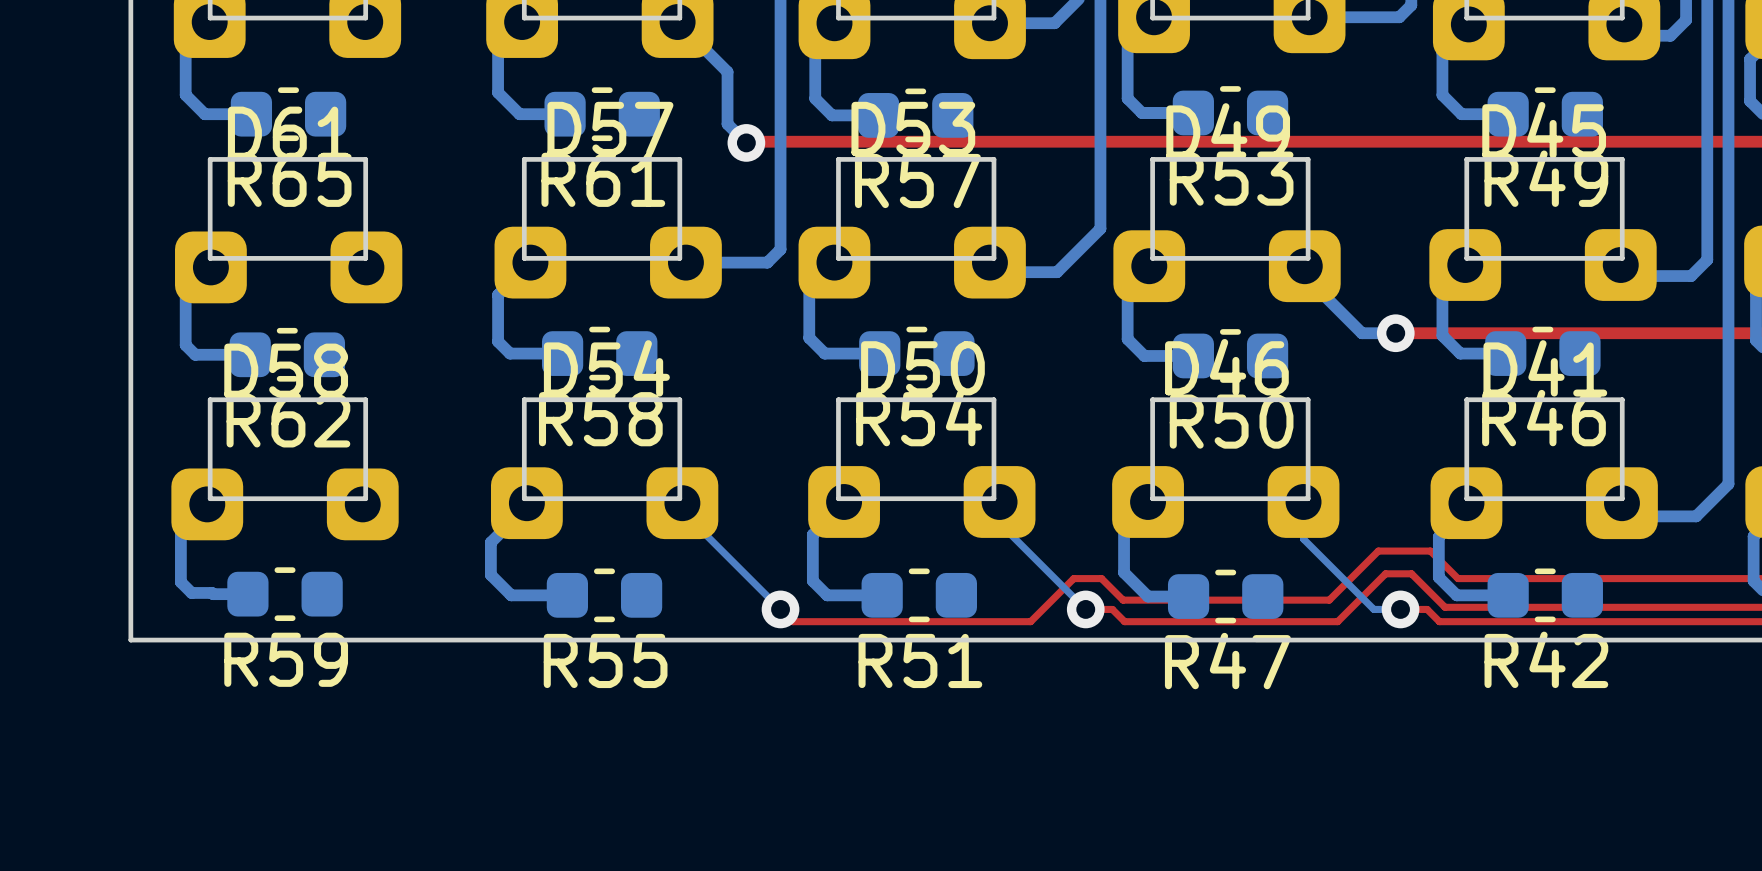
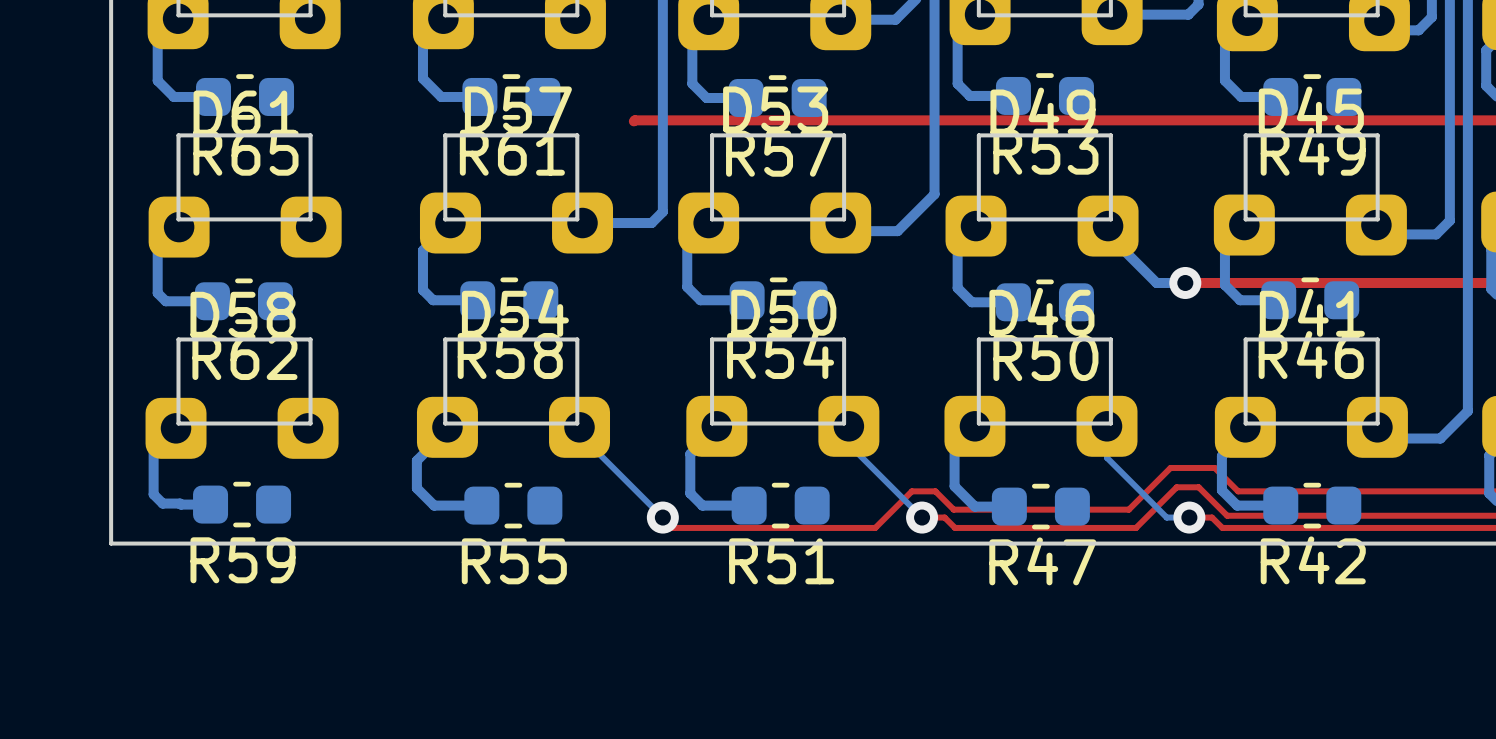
bottom track: (689, 33) (727, 71) (727, 124) (746, 142) -> none
via: (746, 142) -> none

